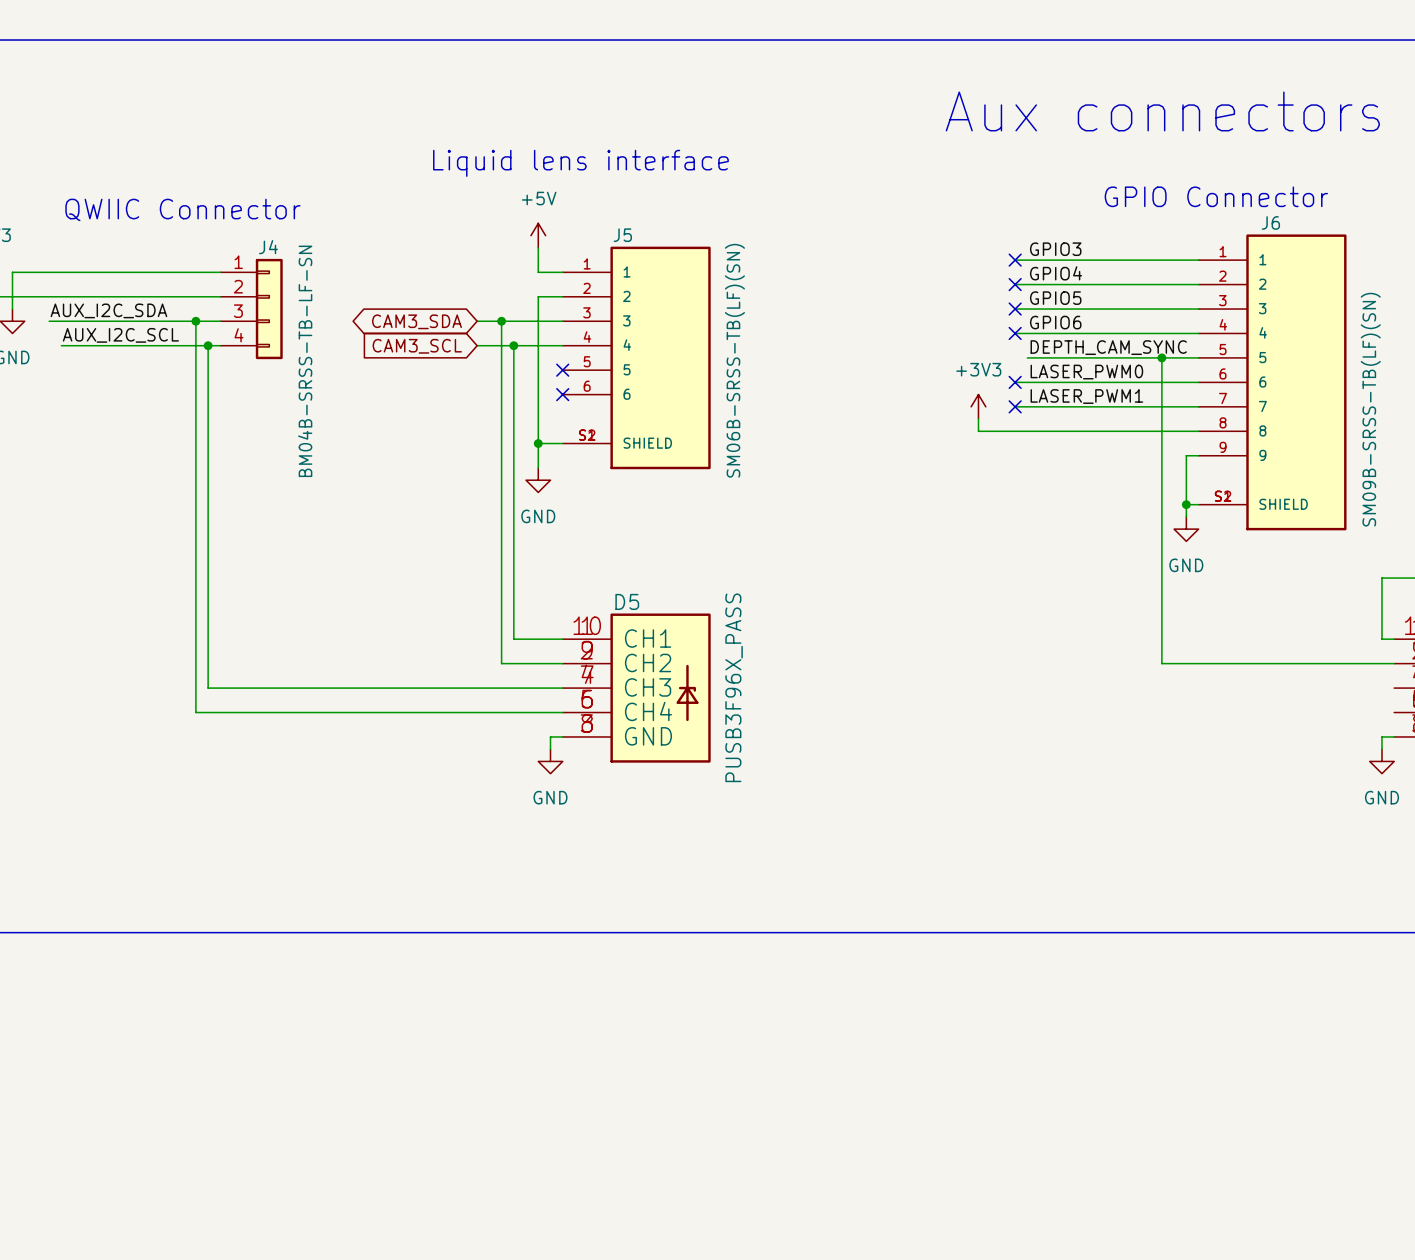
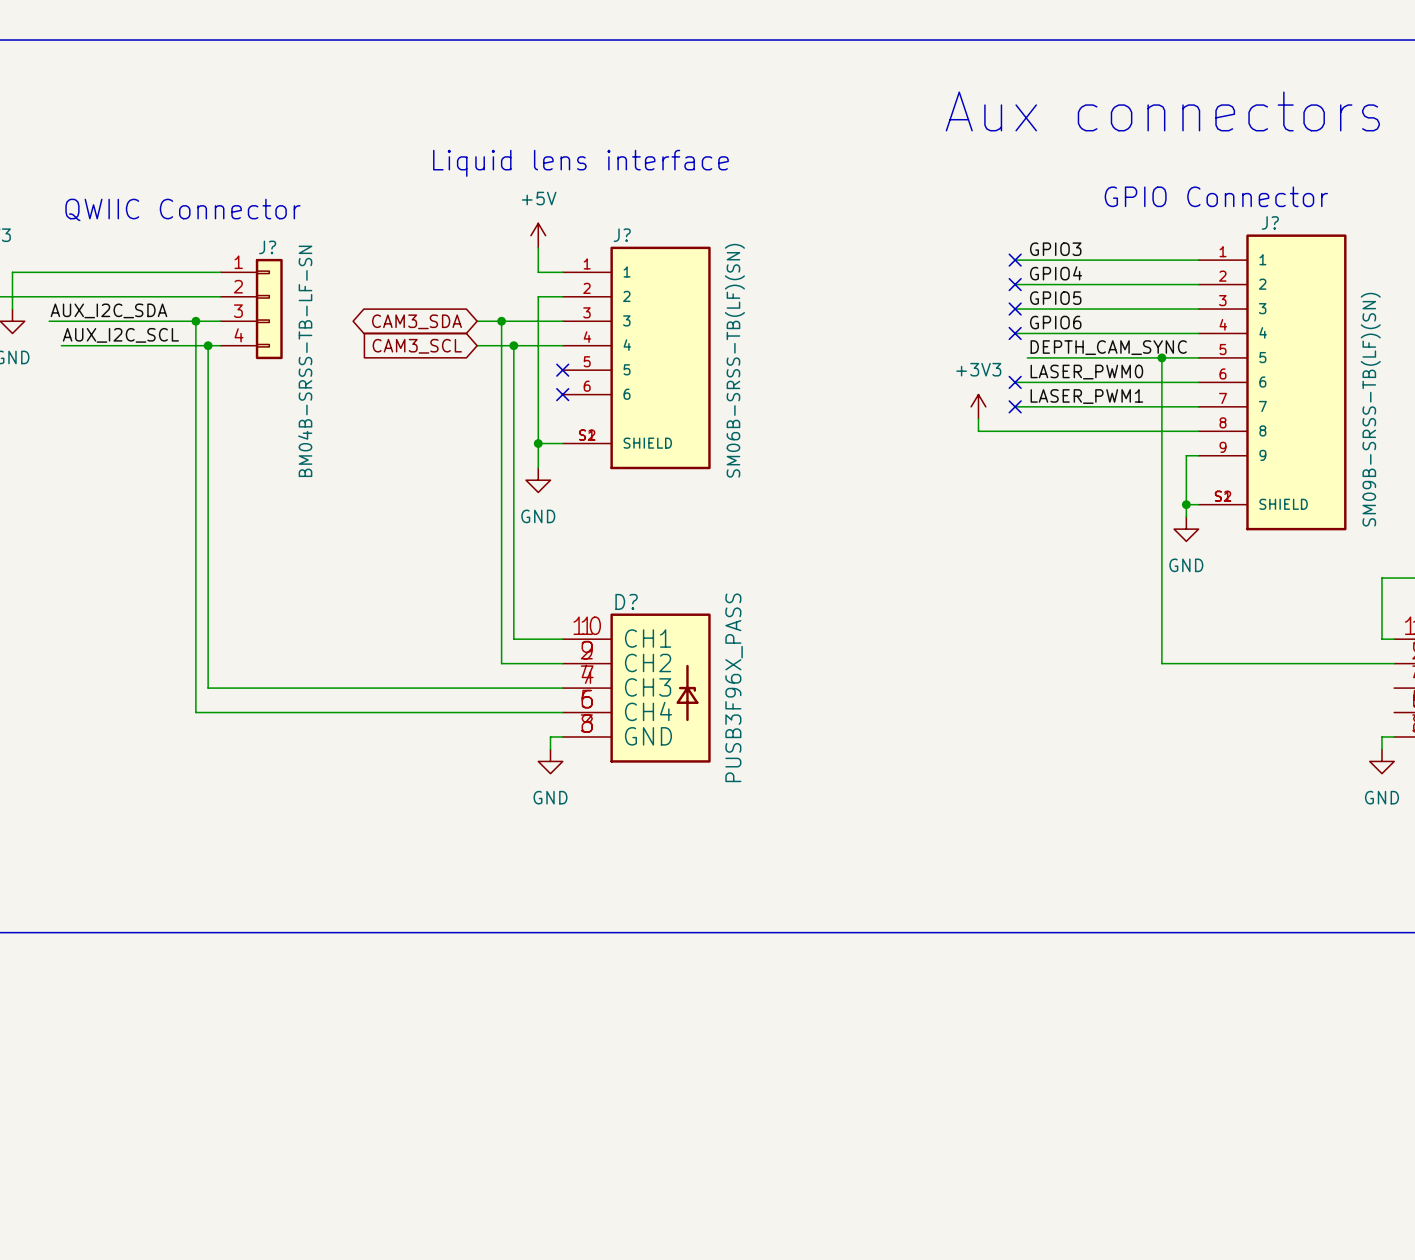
J6 name: J6 (1270, 222) -> J? (1270, 222)
J5 name: J5 (622, 235) -> J? (622, 235)
J4 name: J4 (268, 247) -> J? (267, 247)
D5 name: D5 (627, 601) -> D? (626, 601)

